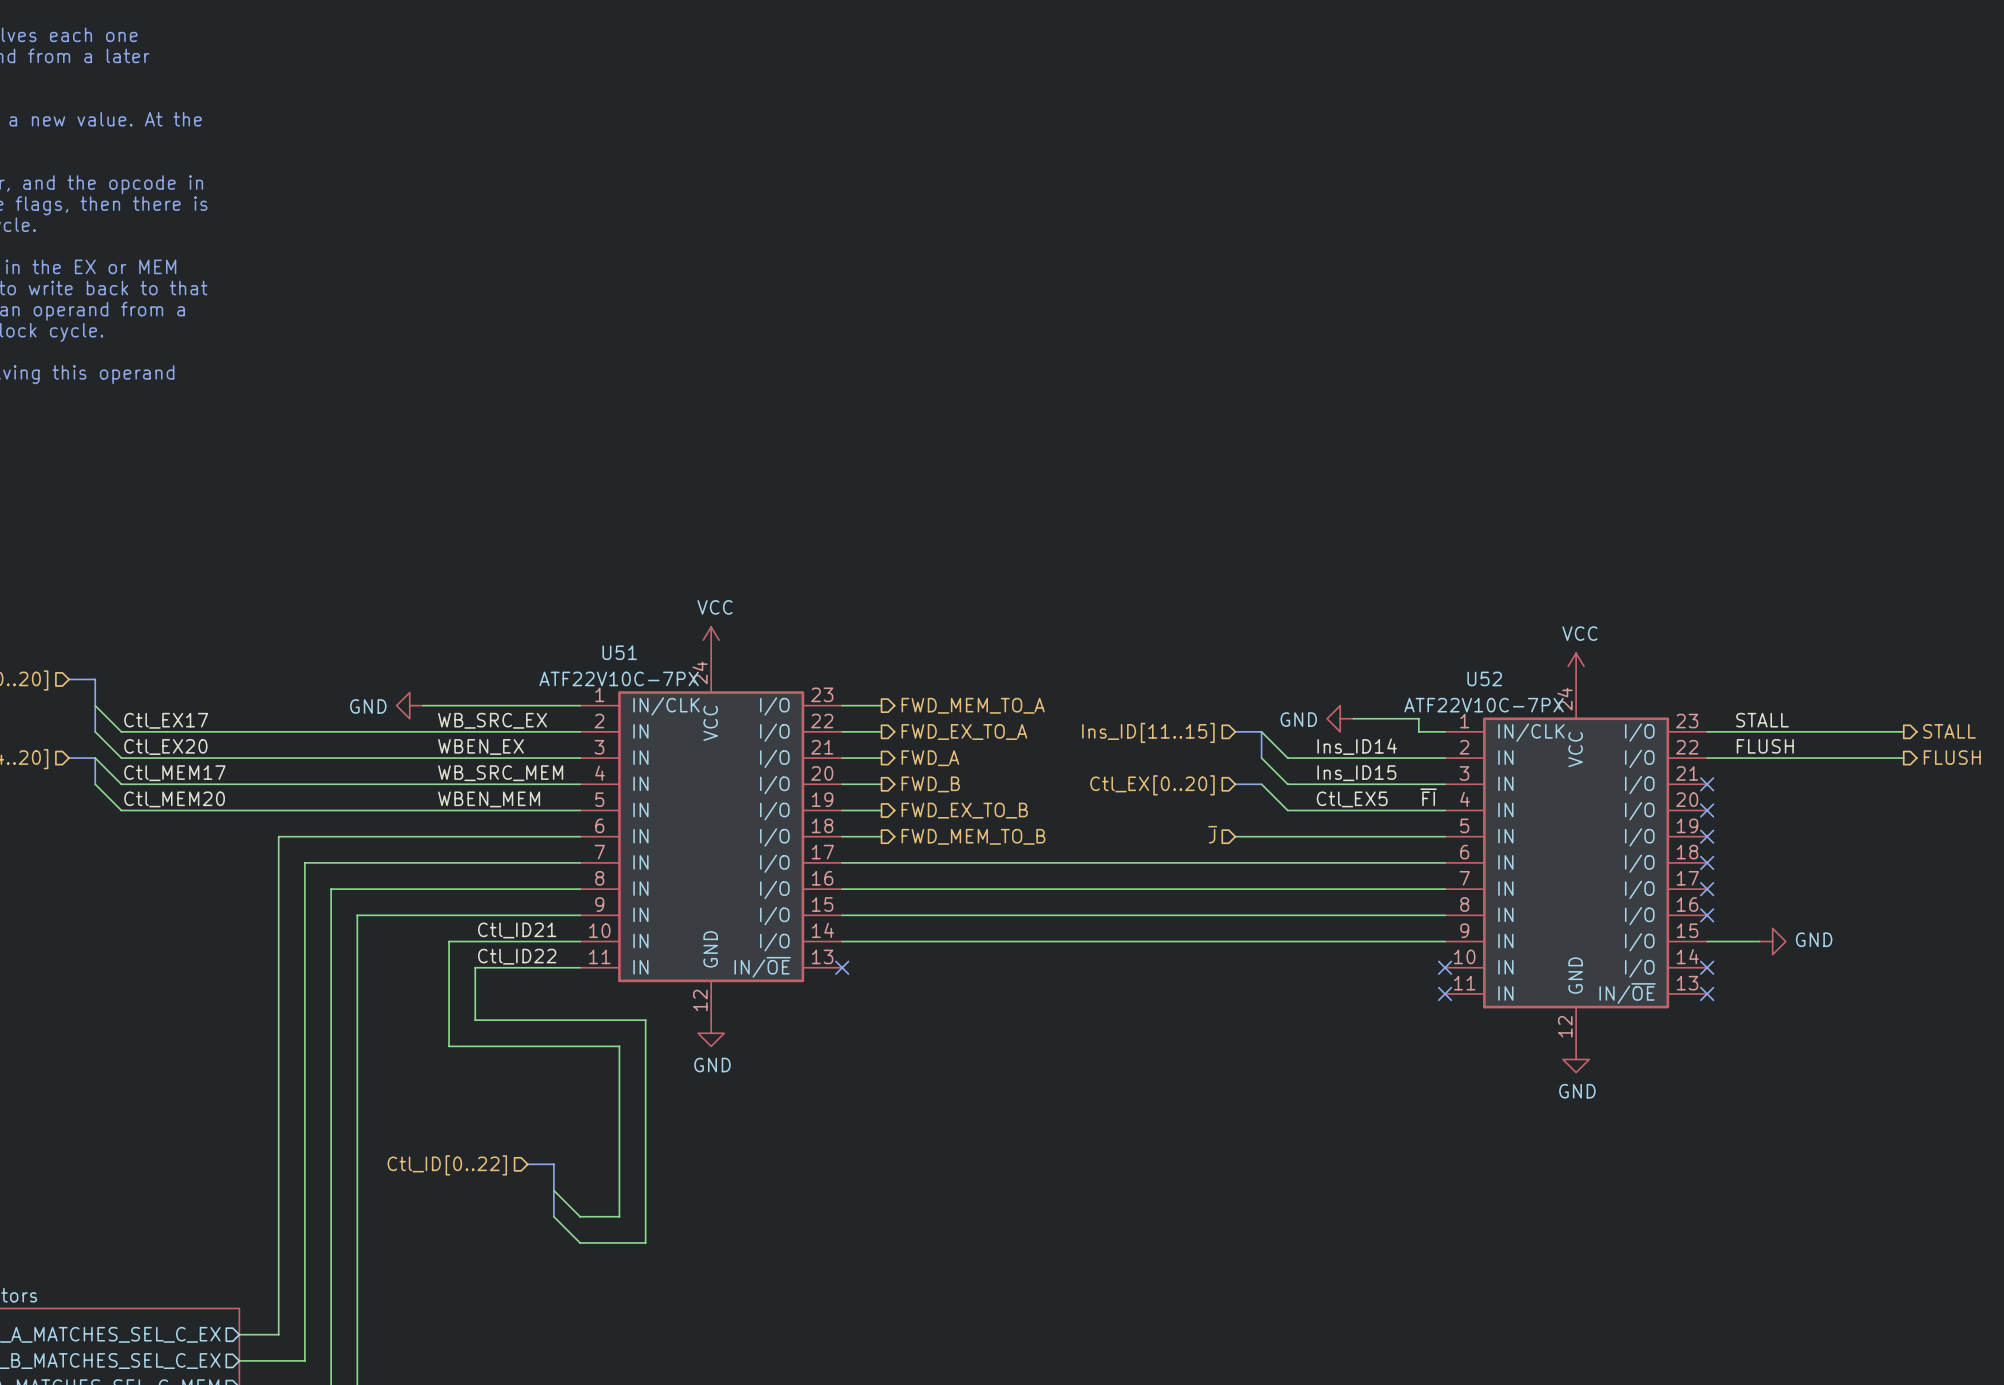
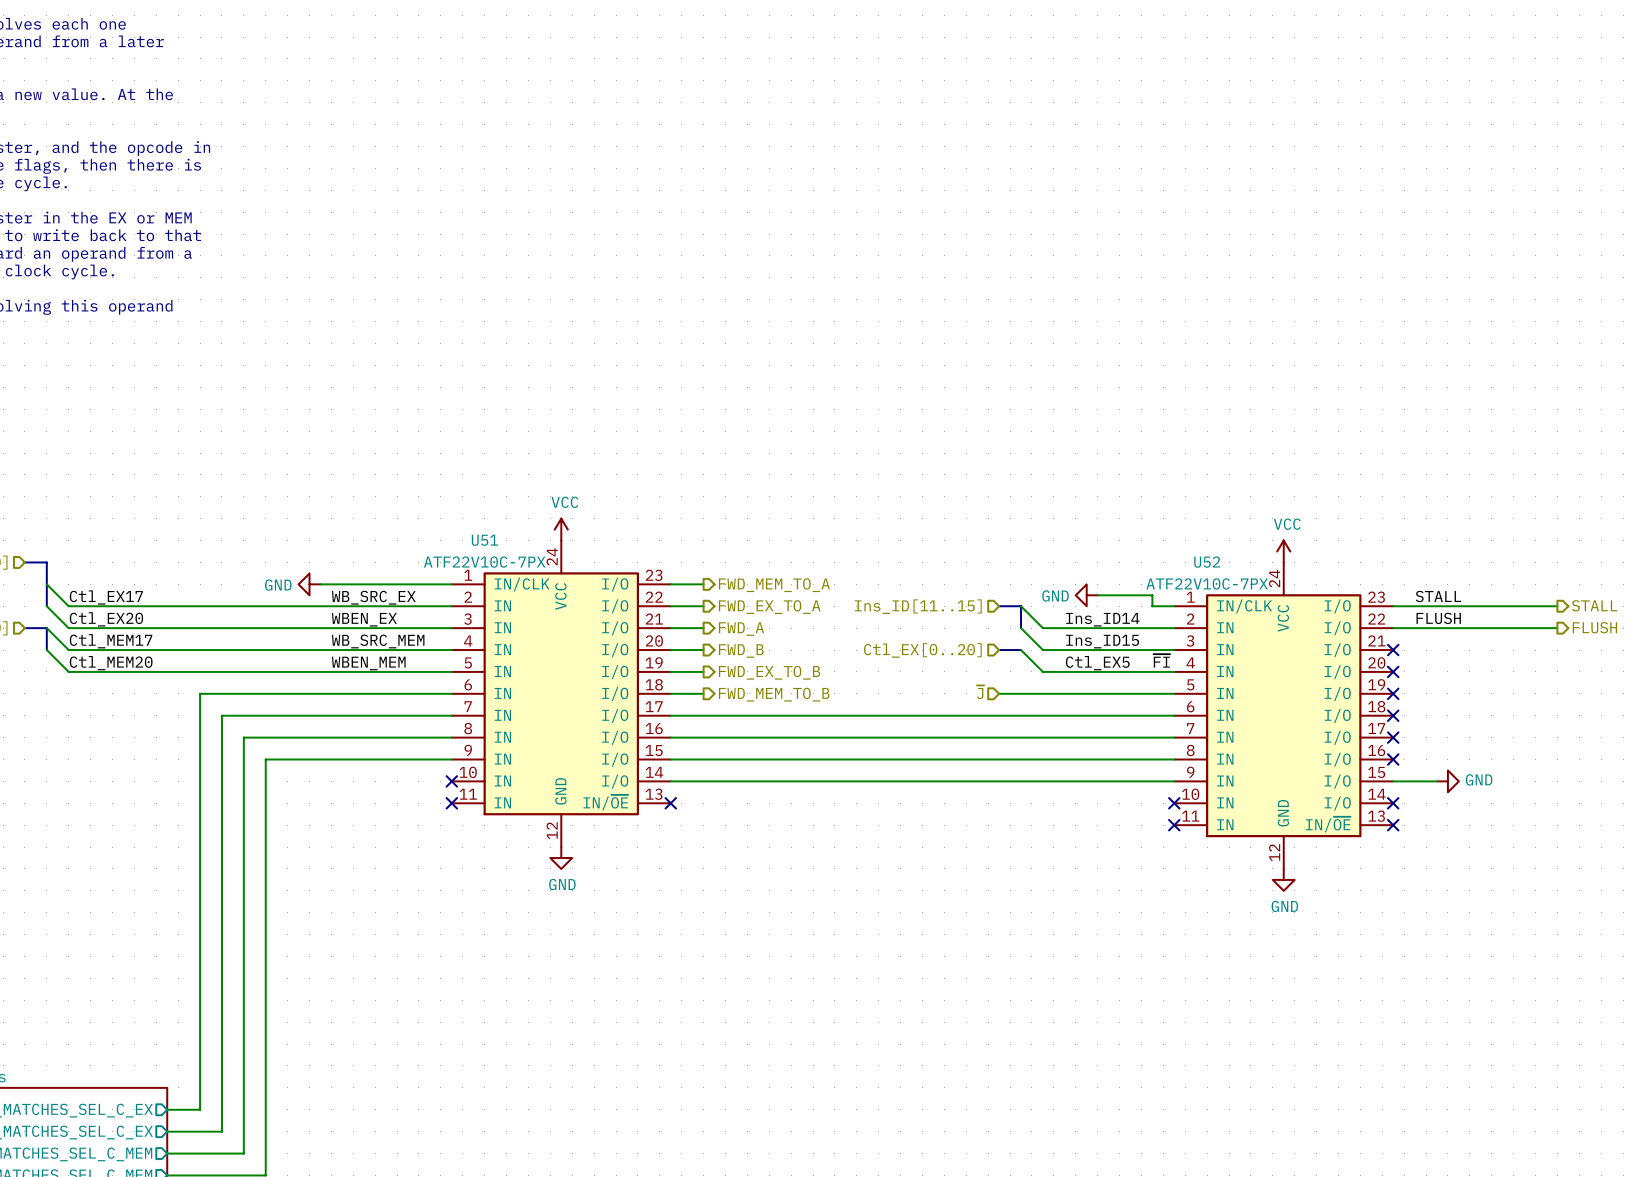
label: Ctl_ID21 (517, 930) -> none
wire: (580, 941) (449, 941) (449, 1046) (619, 1046) (619, 1216) (580, 1216) (553, 1190) -> none
no-connect mark: none -> (451, 781)
label: Ctl_ID22 (517, 956) -> none
wire: (580, 967) (475, 967) (475, 1020) (645, 1020) (645, 1242) (580, 1242) (553, 1216) -> none
no-connect mark: none -> (451, 803)
bus: (527, 1164) (553, 1164) (553, 1216) -> none
hierarchical label: Ctl_ID[0..22] (447, 1165) -> none

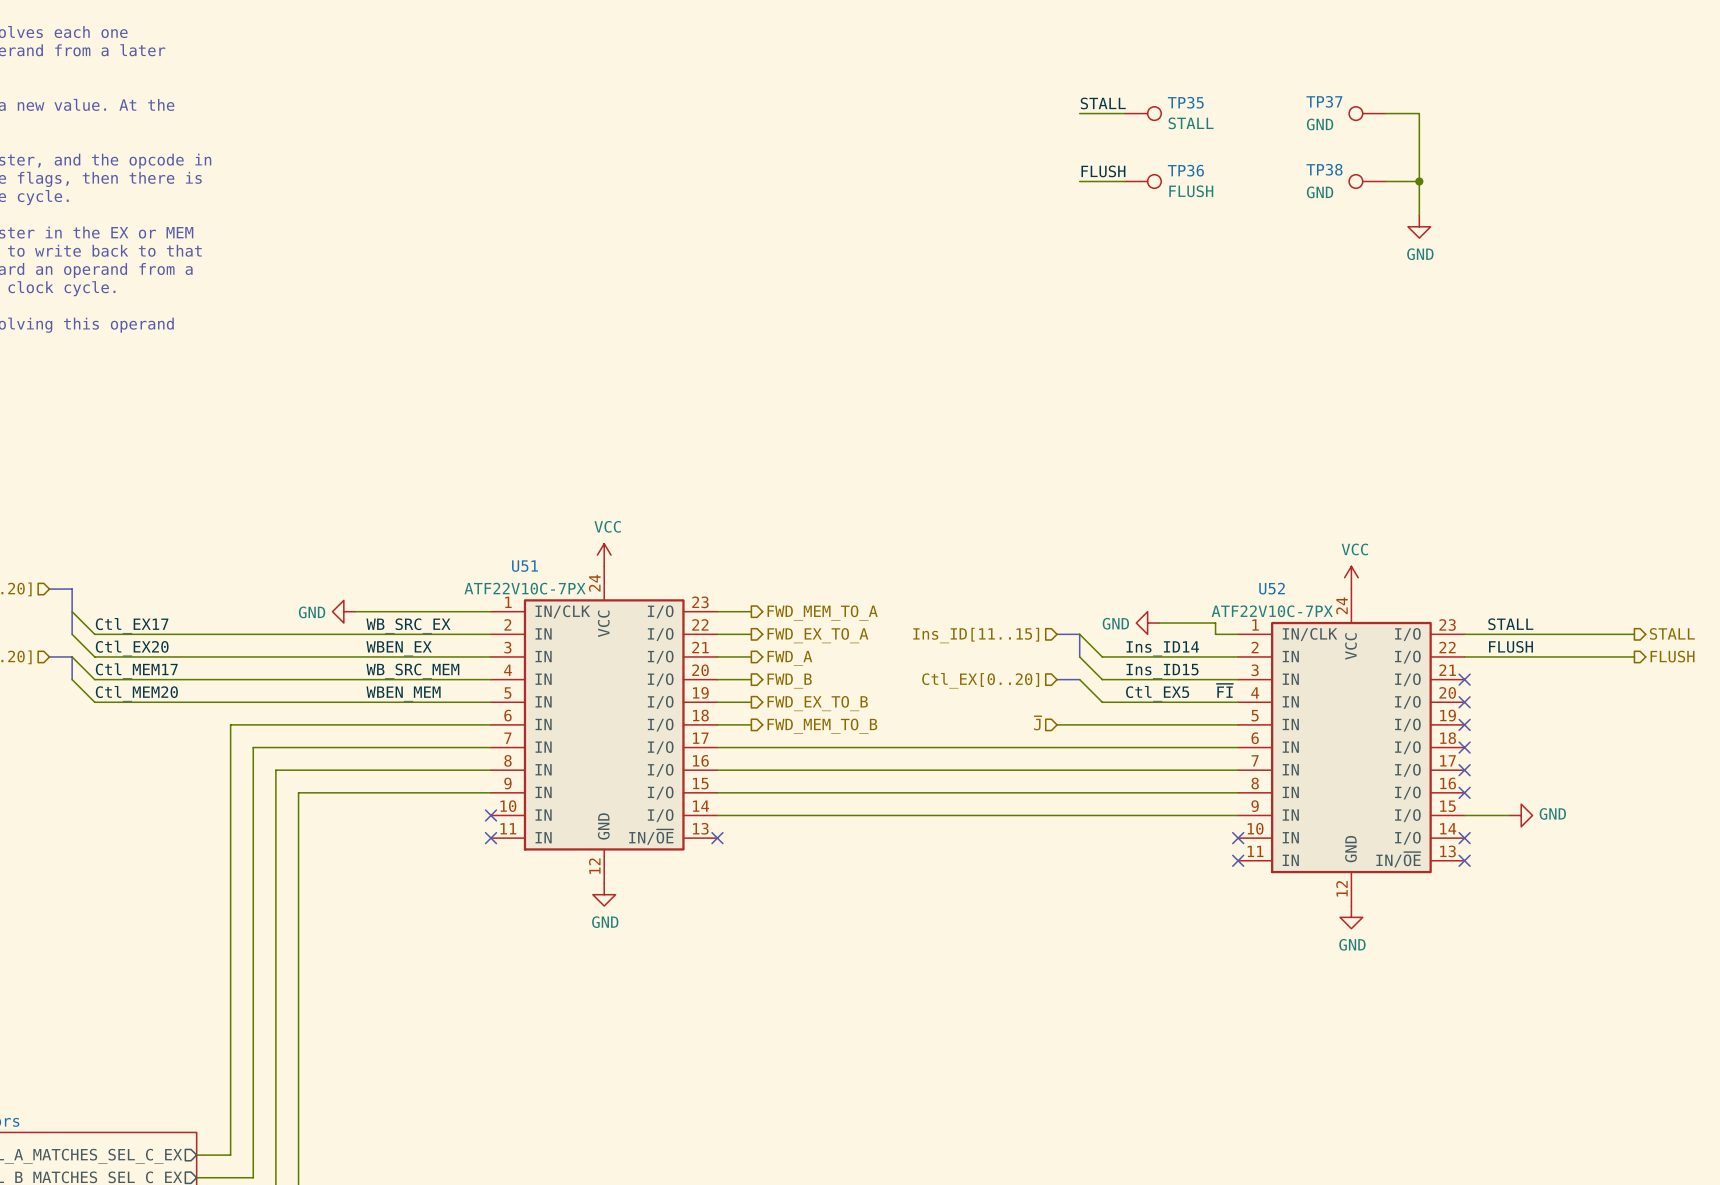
label: none -> STALL (1103, 103)
wire: none -> (1079, 113) (1124, 113)
TP35: none -> STALL (1143, 113)
TP37: none -> GND (1367, 113)
wire: none -> (1385, 113) (1419, 113) (1419, 215)
label: none -> FLUSH (1103, 171)
wire: none -> (1079, 181) (1124, 181)
TP36: none -> FLUSH (1143, 181)
TP38: none -> GND (1367, 181)
wire: none -> (1385, 181) (1419, 181)
junction: none -> (1419, 181)
power symbol: none -> GND (1419, 226)

